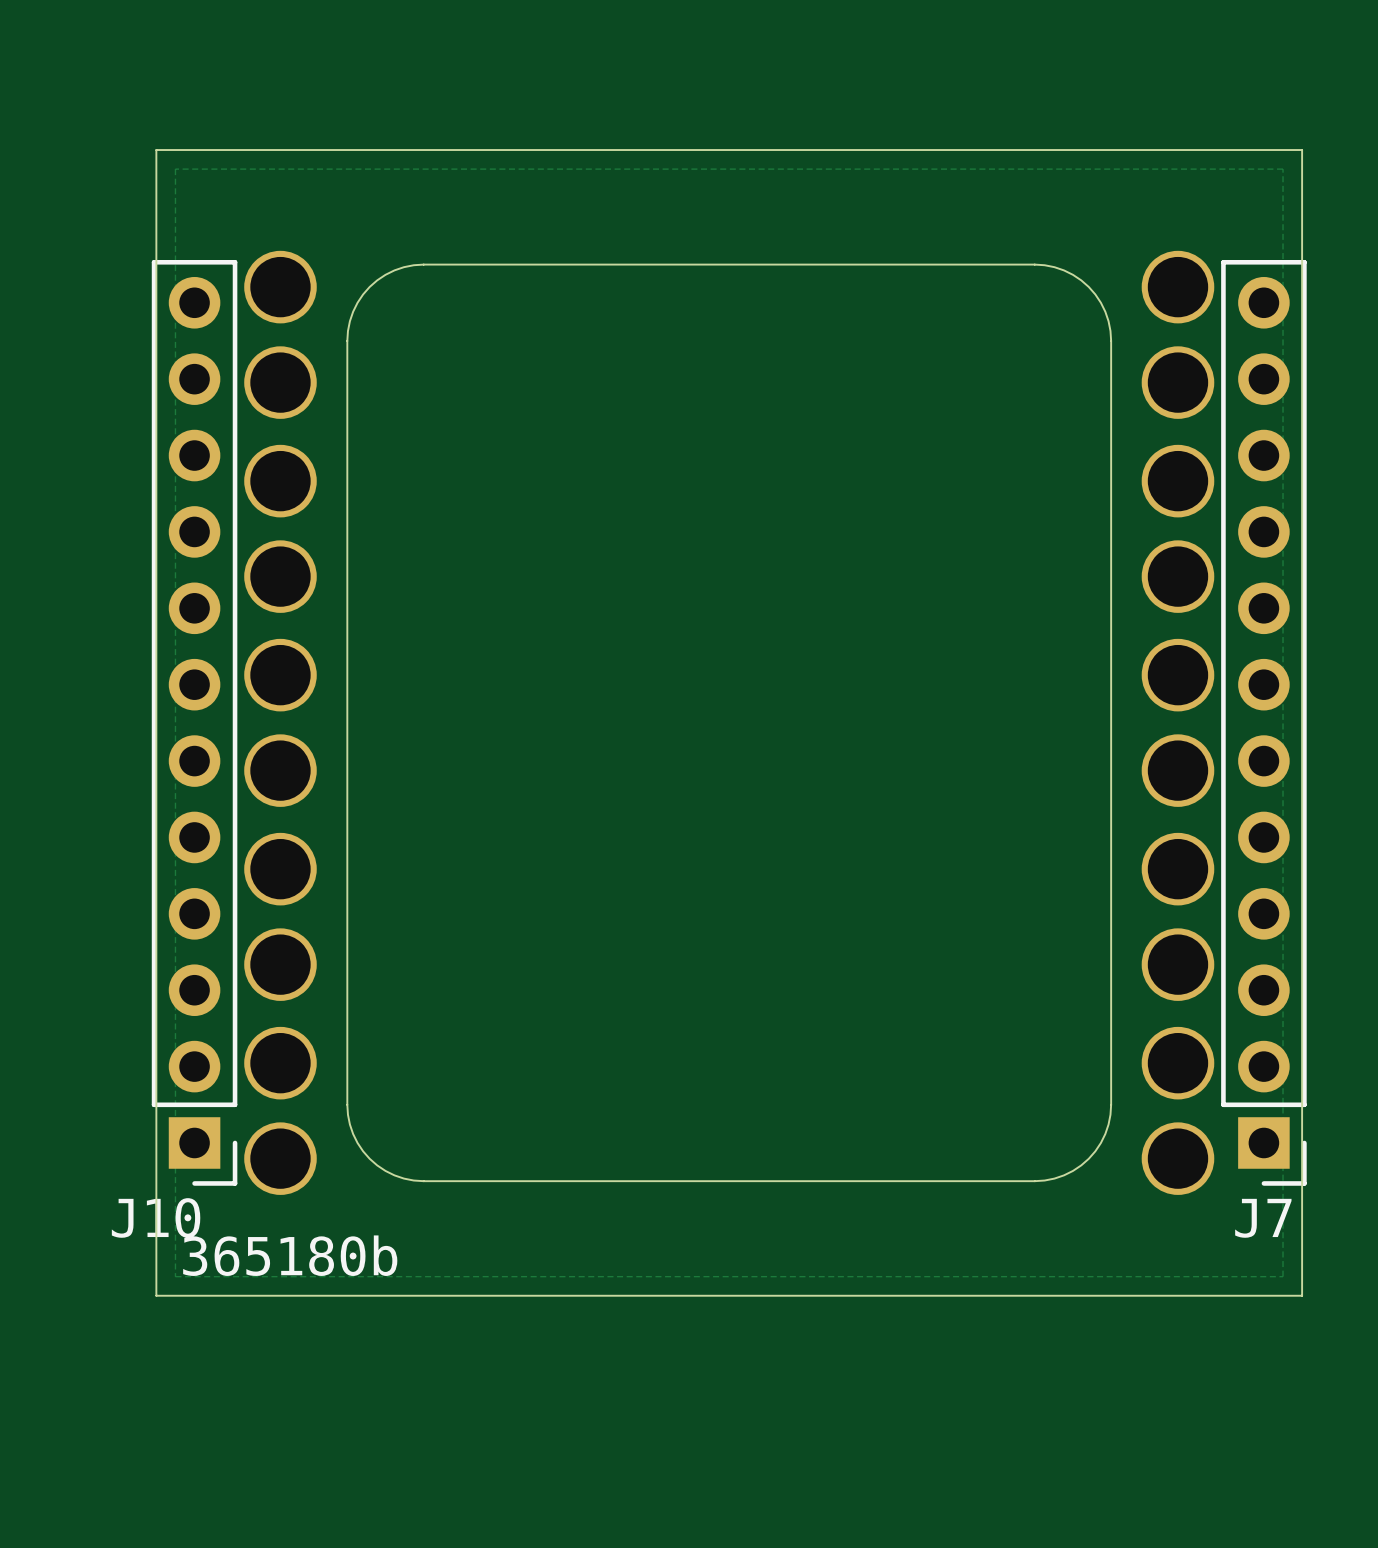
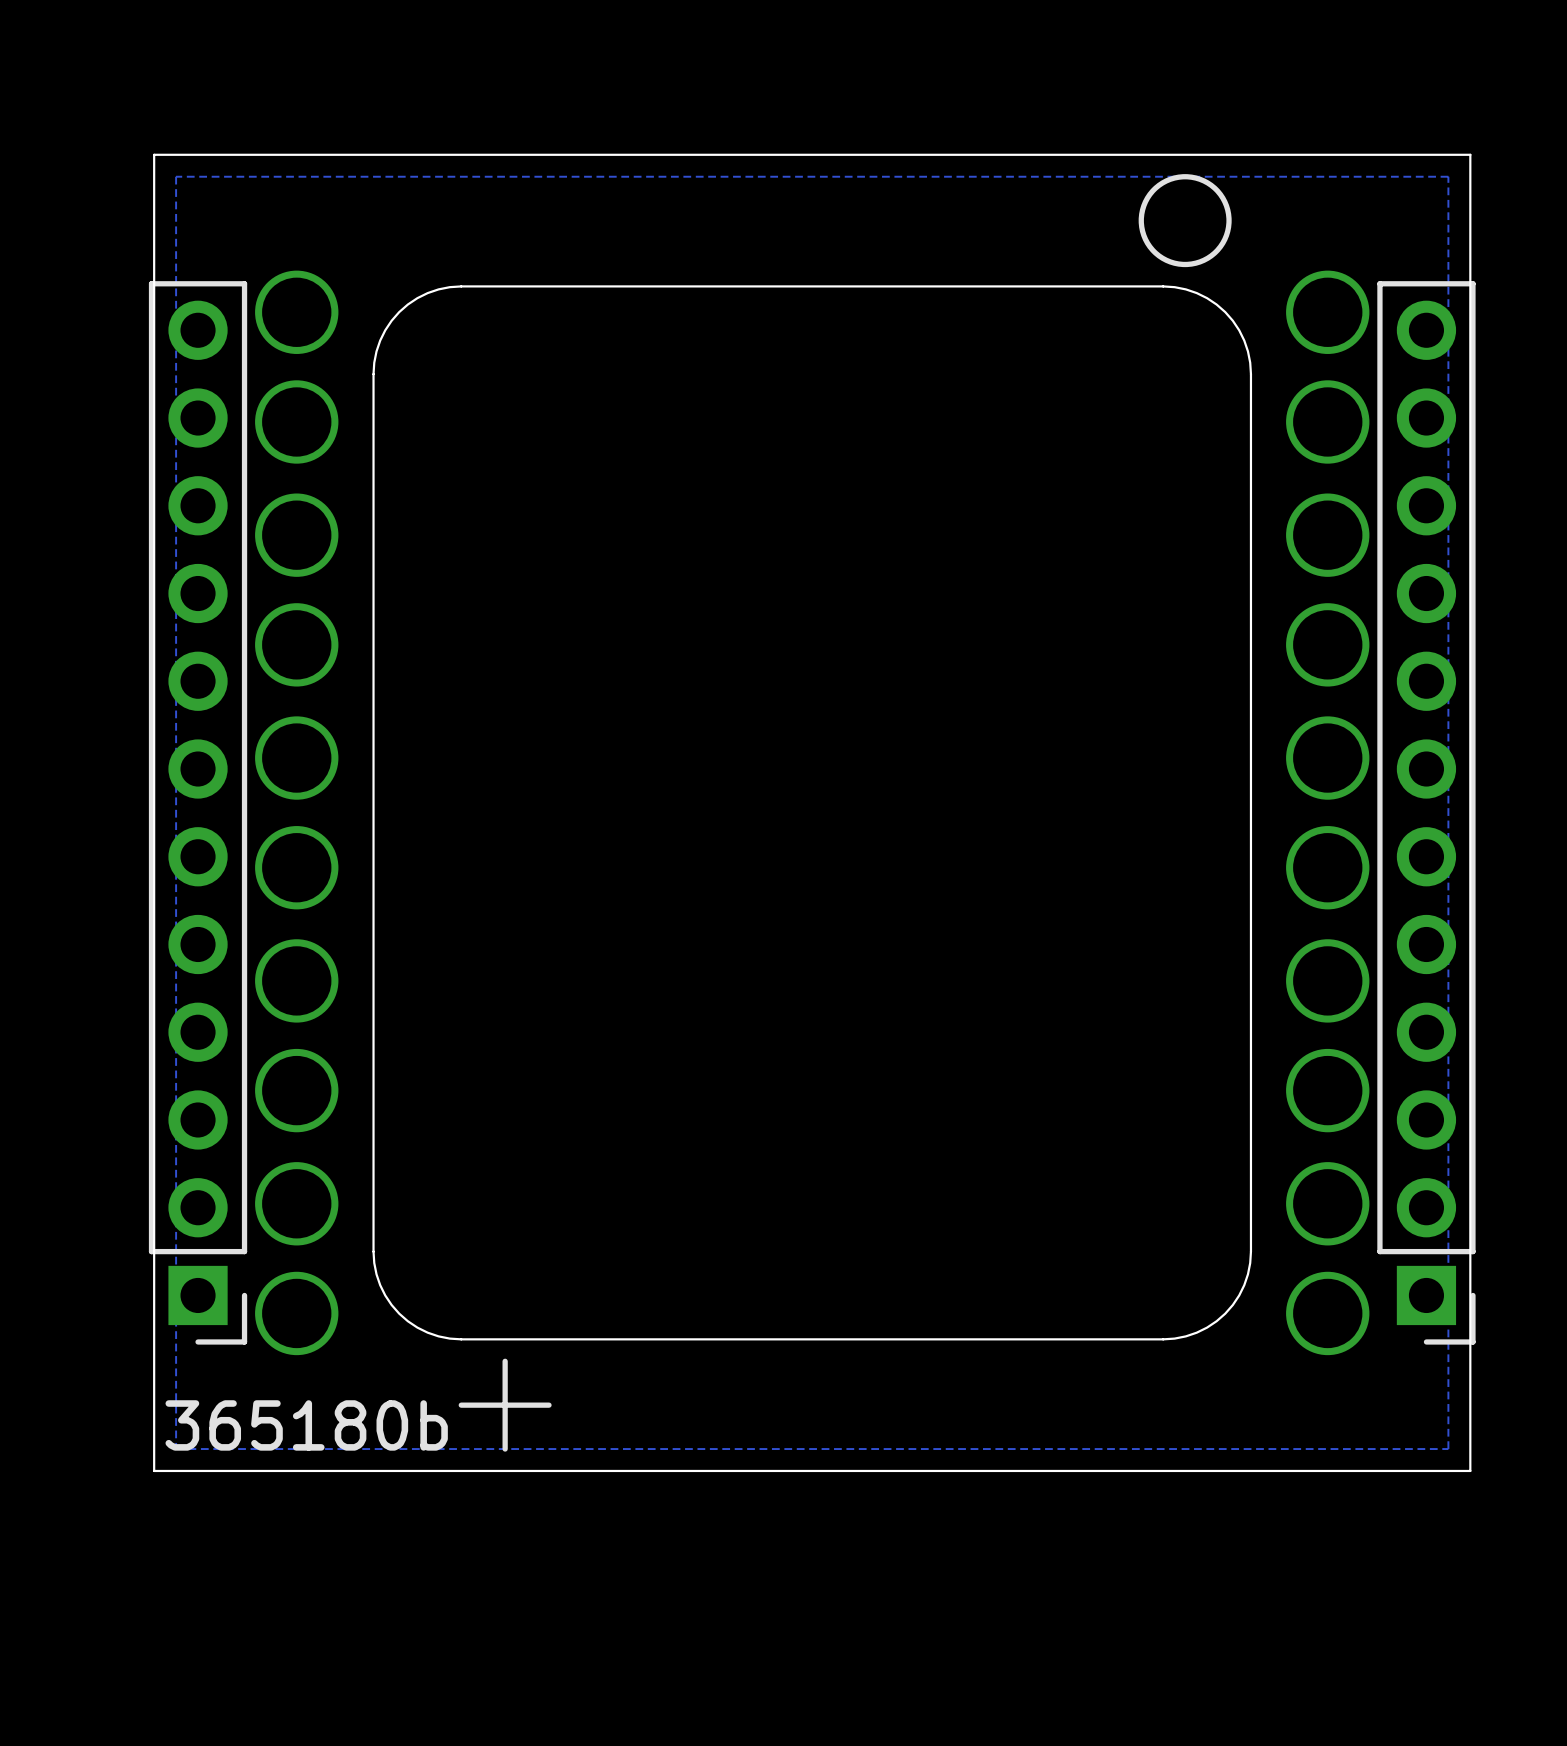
drawing: none -> [1138, 174, 1232, 268]
line: none -> (505, 1361) (505, 1449)
J10 name: J10 (156, 1217) -> none
J7 name: J7 (1263, 1218) -> none
line: none -> (549, 1405) (461, 1405)

